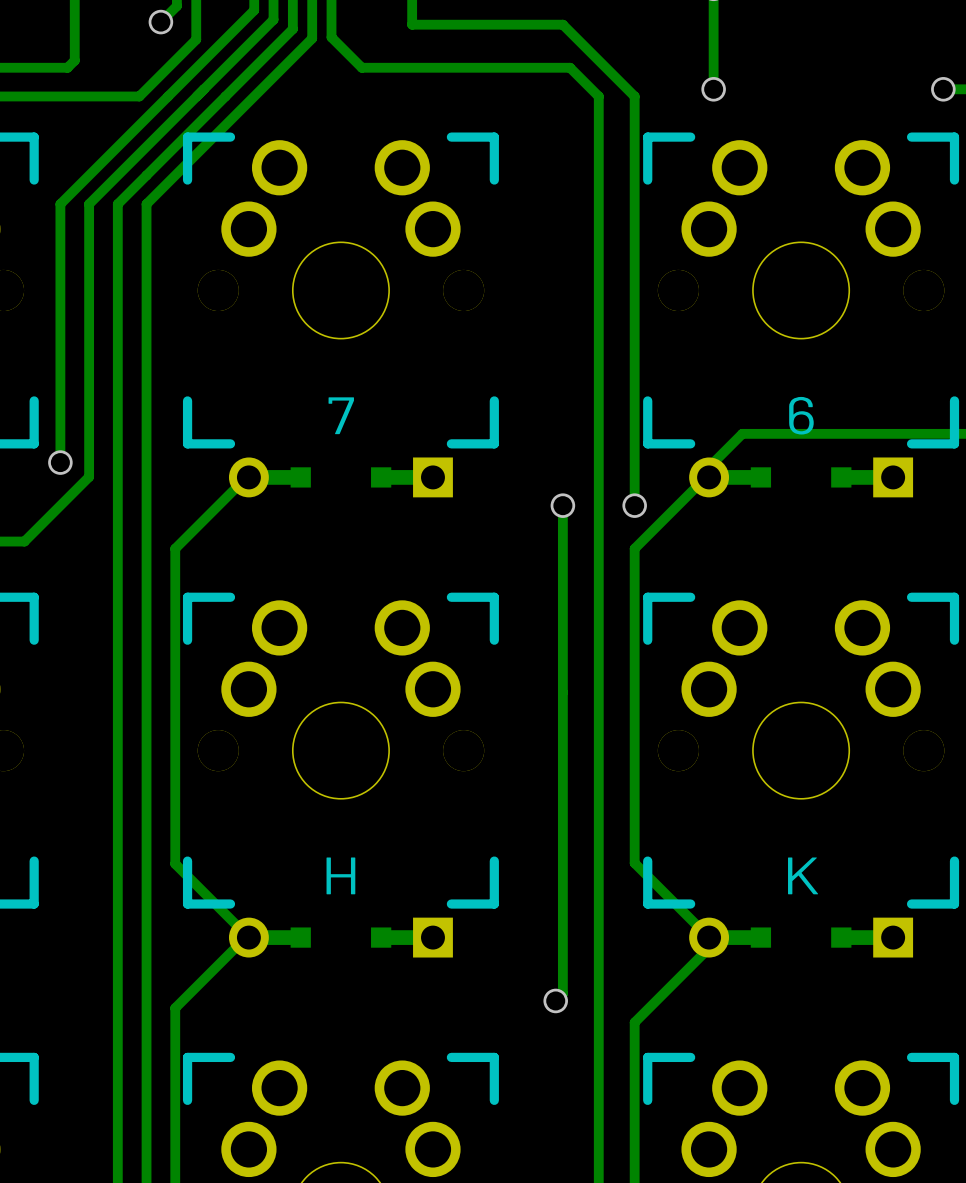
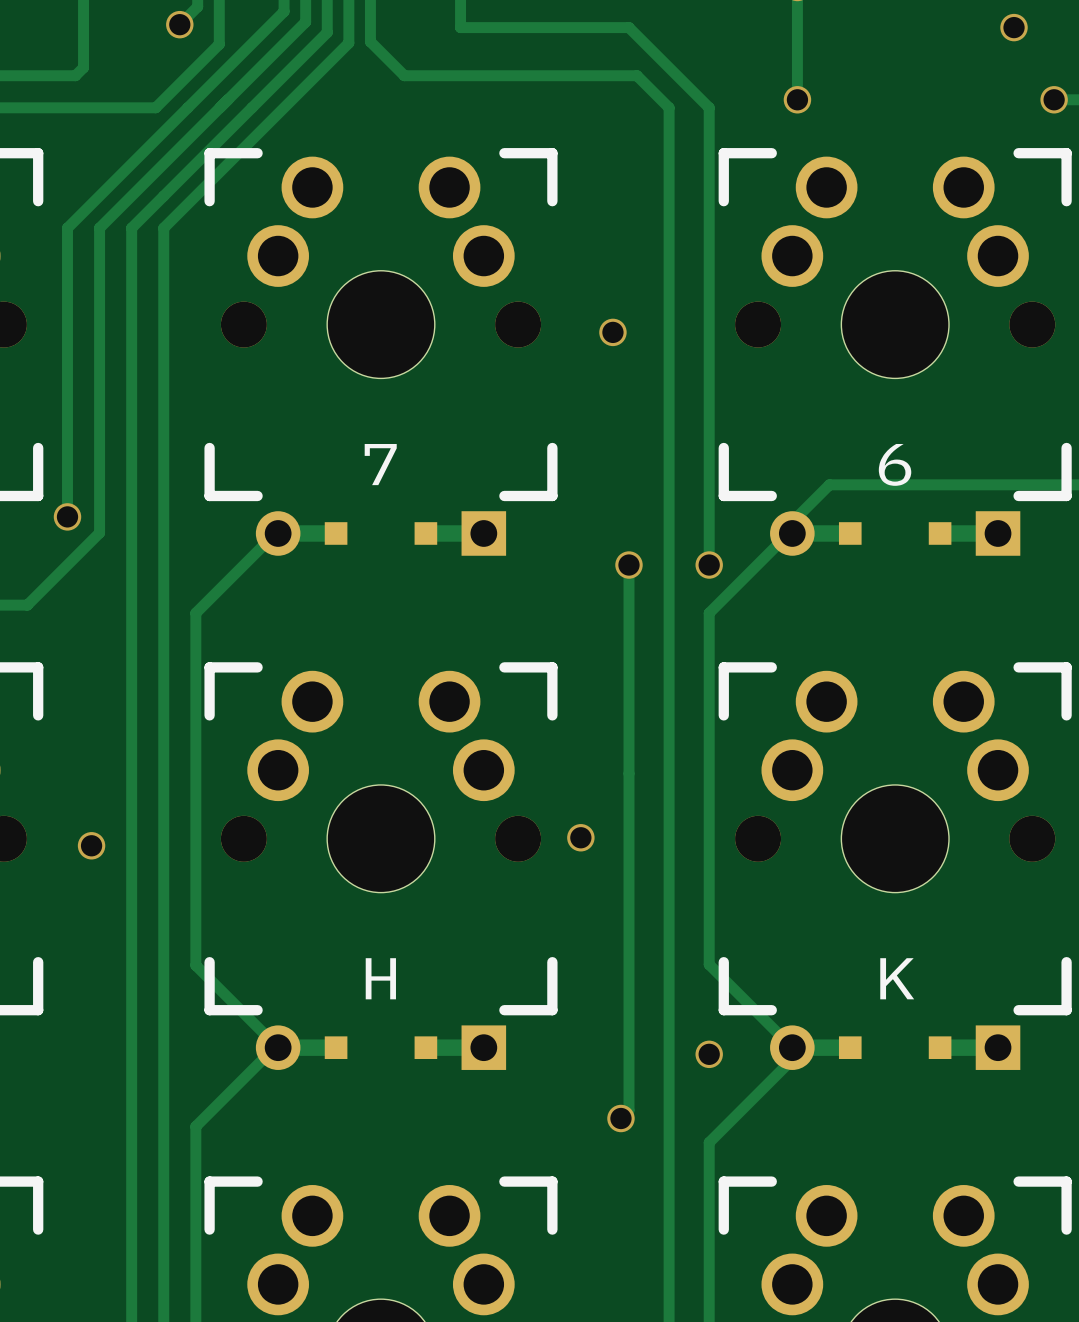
via: none -> (1014, 27)
via: none -> (612, 332)
via: none -> (580, 837)
via: none -> (91, 845)
via: none -> (709, 1054)

